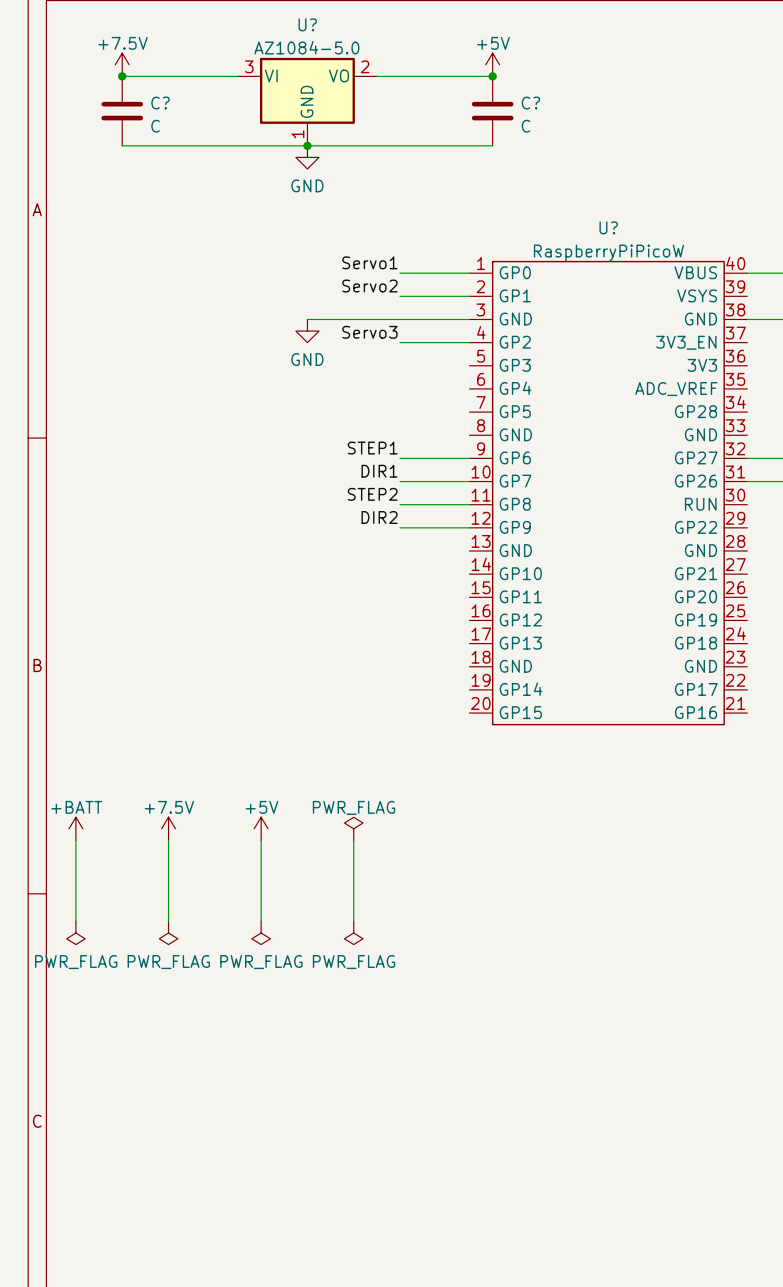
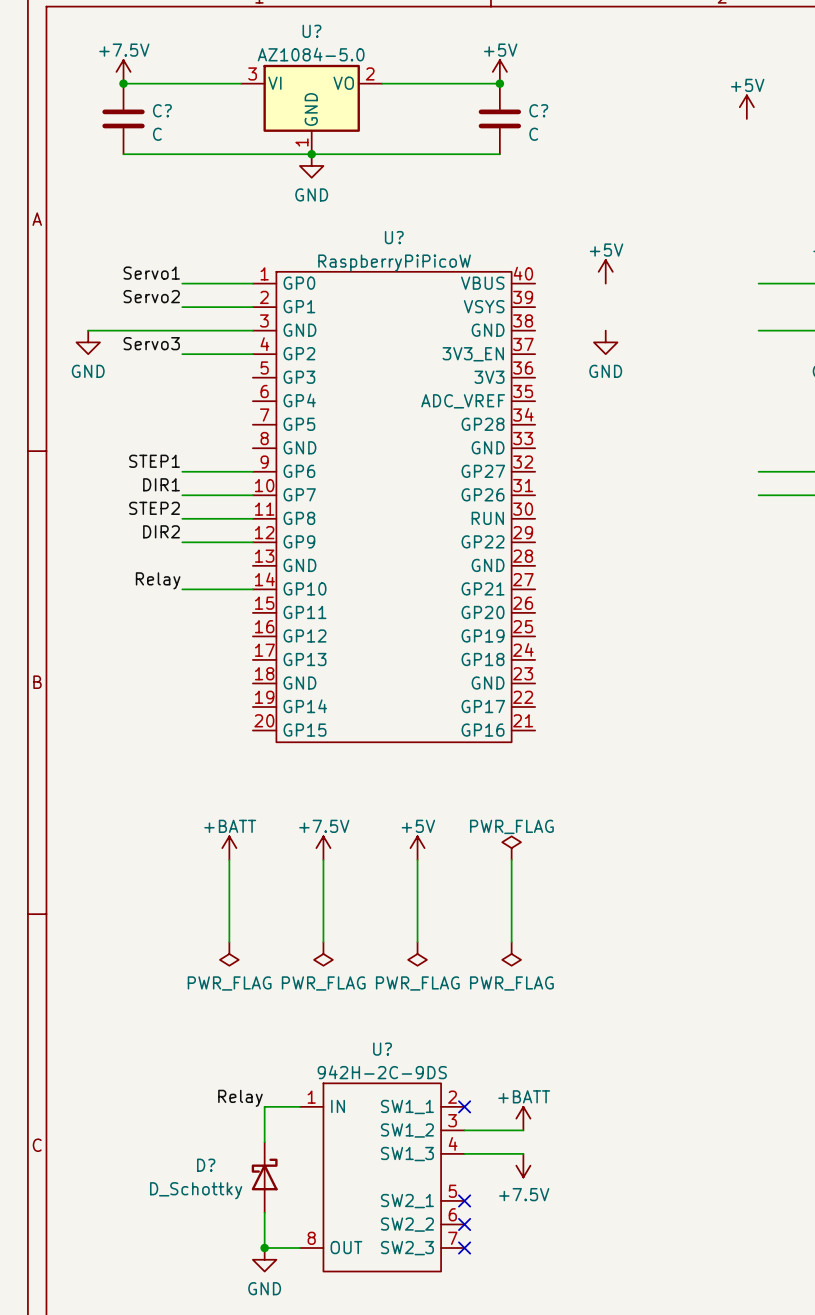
power symbol: none -> +5V (746, 107)
power symbol: none -> +5V (605, 271)
label position: Servo1 (369, 262) -> Servo1 (151, 273)
wire: (400, 273) (469, 273) -> (182, 283) (252, 283)
label position: Servo2 (369, 286) -> Servo2 (151, 296)
wire: (400, 296) (469, 296) -> (182, 307) (252, 307)
wire: (307, 319) (469, 319) -> (88, 330) (252, 330)
power symbol: none -> GND (88, 342)
power symbol: GND (307, 331) -> none
power symbol: none -> GND (605, 342)
label position: Servo3 (369, 332) -> Servo3 (151, 343)
wire: (400, 342) (469, 342) -> (182, 354) (252, 354)
label position: STEP1 (372, 448) -> STEP1 (154, 461)
wire: (400, 458) (469, 458) -> (182, 471) (252, 471)
label position: DIR1 (379, 471) -> DIR1 (161, 484)
wire: (400, 481) (469, 481) -> (182, 495) (252, 495)
U? position: (608, 493) -> (394, 507)
label position: STEP2 (372, 494) -> STEP2 (154, 508)
wire: (400, 504) (469, 504) -> (182, 518) (252, 518)
label position: DIR2 (379, 517) -> DIR2 (161, 531)
wire: (400, 527) (469, 527) -> (182, 542) (252, 542)
label: none -> Relay (158, 580)
wire: none -> (182, 589) (252, 589)
power symbol position: +BATT (75, 828) -> +BATT (229, 848)
power symbol position: +7.5V (168, 828) -> +7.5V (323, 848)
power symbol position: +5V (261, 828) -> +5V (417, 848)
power symbol: PWR_FLAG (353, 828) -> none
power symbol: none -> PWR_FLAG (511, 848)
wire: (75, 840) (75, 921) -> (229, 859) (229, 942)
wire: (168, 840) (168, 921) -> (323, 859) (323, 942)
wire: (261, 840) (261, 921) -> (417, 859) (417, 942)
wire: (353, 840) (353, 921) -> (511, 859) (511, 942)
power symbol: PWR_FLAG (75, 933) -> none
power symbol: PWR_FLAG (168, 933) -> none
power symbol: none -> PWR_FLAG (229, 953)
power symbol: PWR_FLAG (261, 933) -> none
power symbol: none -> PWR_FLAG (323, 953)
power symbol: PWR_FLAG (353, 933) -> none
power symbol: none -> PWR_FLAG (417, 953)
power symbol: none -> PWR_FLAG (511, 953)
label: none -> Relay (240, 1098)
wire: none -> (299, 1106) (264, 1106) (264, 1142)
no-connect mark: none -> (464, 1106)
power symbol: none -> +BATT (523, 1118)
wire: none -> (464, 1130) (523, 1130)
wire: none -> (464, 1153) (523, 1153)
power symbol: none -> +7.5V (523, 1165)
D?: none -> D_Schottky (264, 1177)
U?: none -> 942H-2C-9DS (382, 1177)
no-connect mark: none -> (464, 1200)
wire: none -> (264, 1212) (264, 1248) (299, 1248)
no-connect mark: none -> (464, 1224)
junction: none -> (264, 1248)
no-connect mark: none -> (464, 1248)
power symbol: none -> GND (264, 1259)

